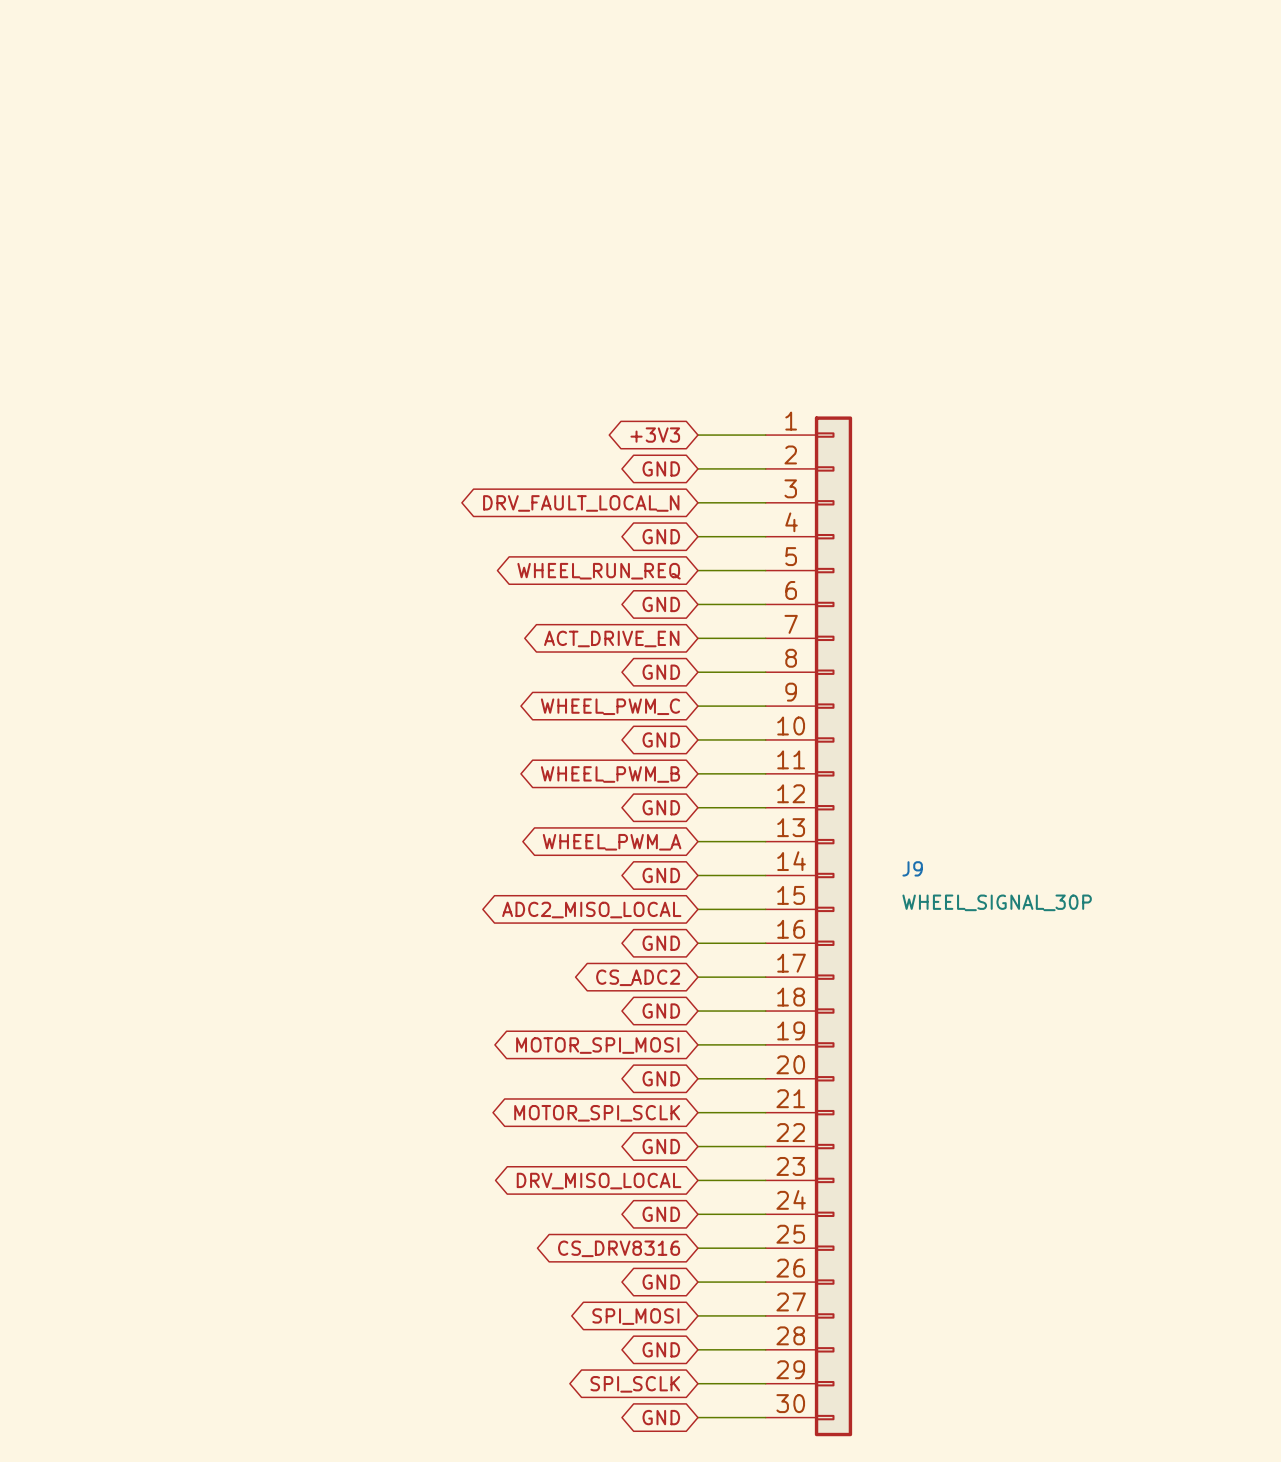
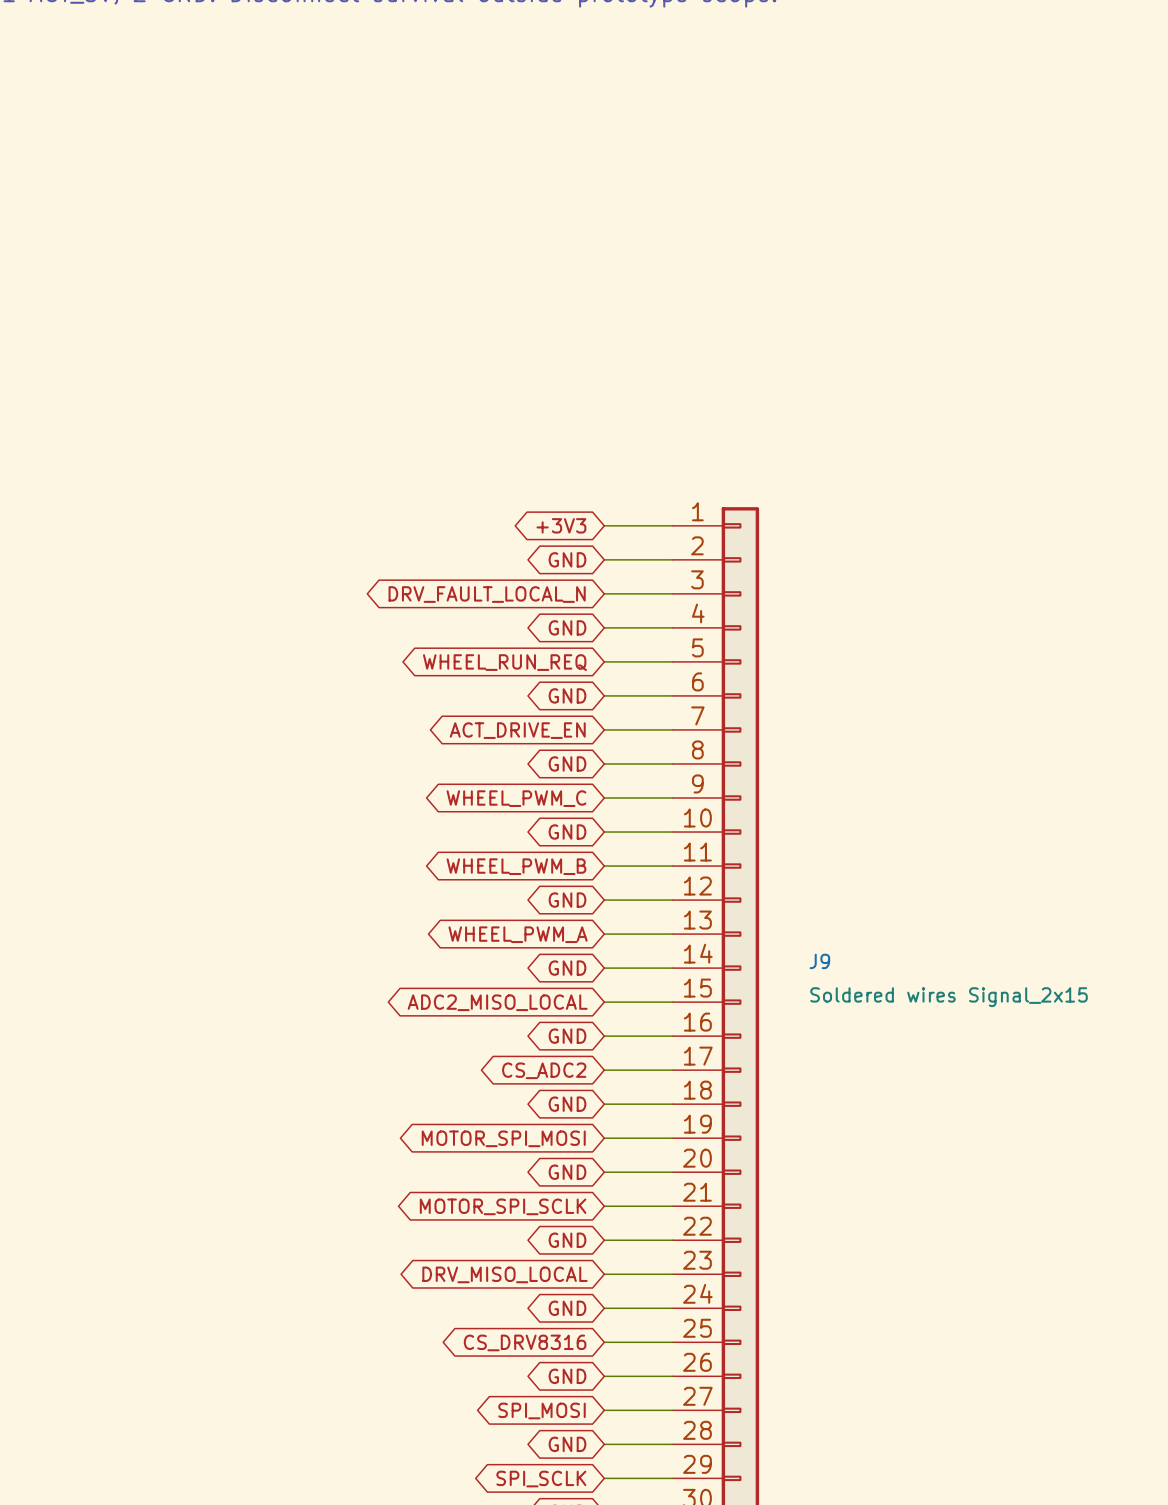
J9 value: WHEEL_SIGNAL_30P (997, 902) -> Soldered wires Signal_2x15 (949, 997)

